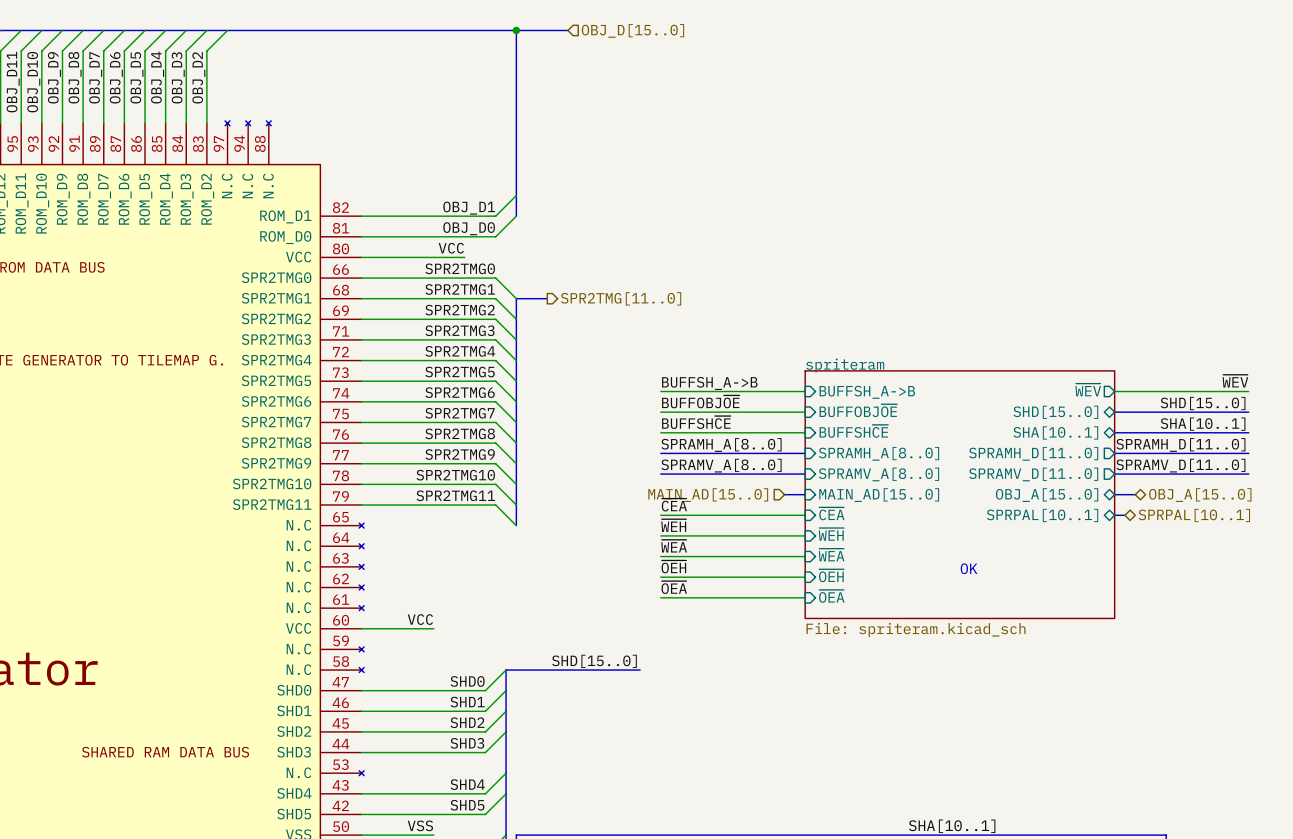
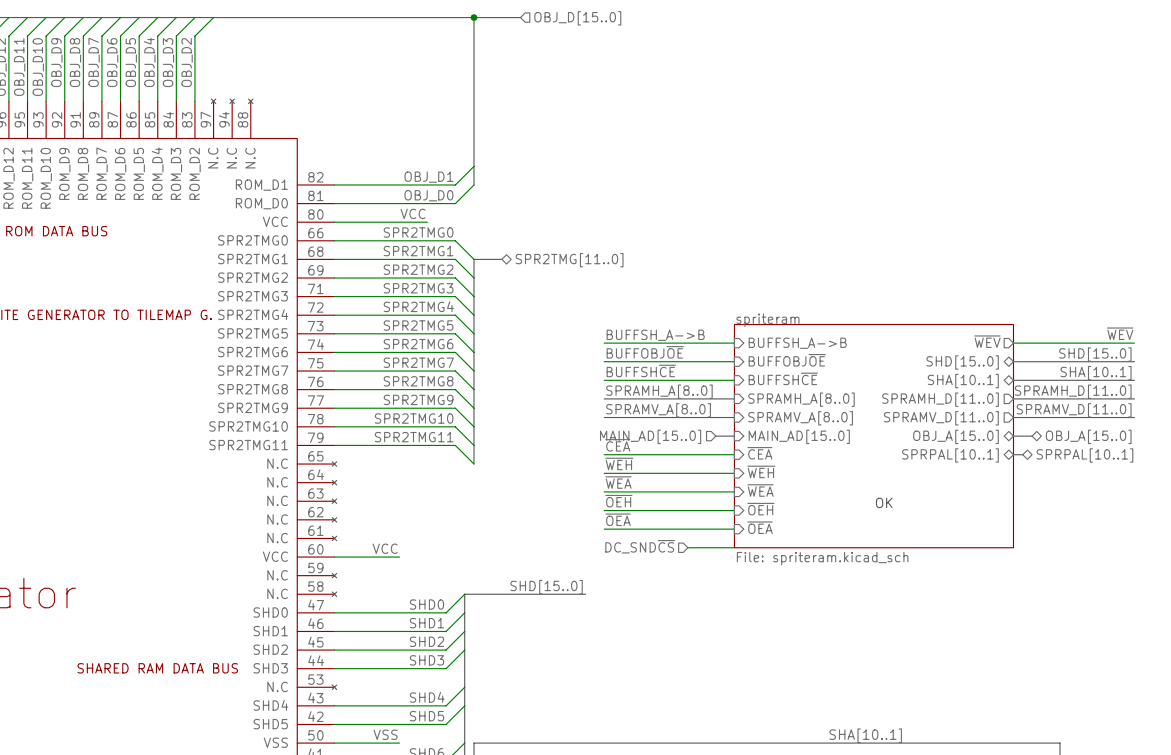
hierarchical label shape: output (621, 298) -> bidirectional (569, 260)
hierarchical label: none -> DC_SND~{CS} (640, 546)
wire: none -> (687, 547) (734, 547)

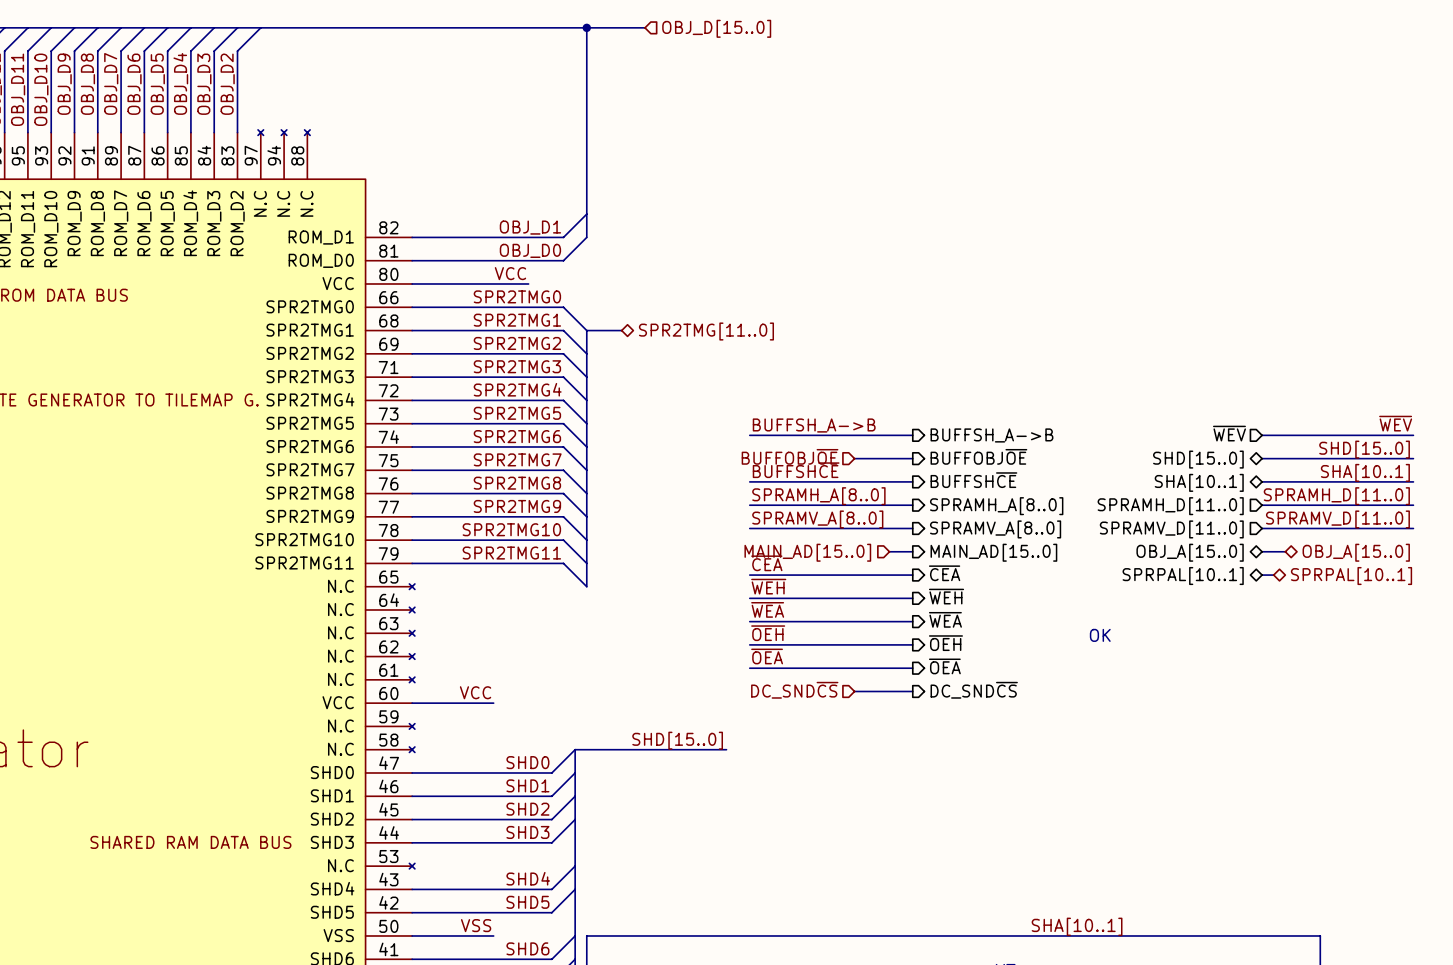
label: BUFFOBJ~{OE} (645, 352) -> none
hierarchical label: none -> BUFFOBJ~{OE} (790, 456)
wire: (604, 361) (687, 361) -> none
sheet spriteram: File: spriteram.kicad_sch (873, 436) -> none
sheet pin: none -> DC_SND~{CS} (974, 690)

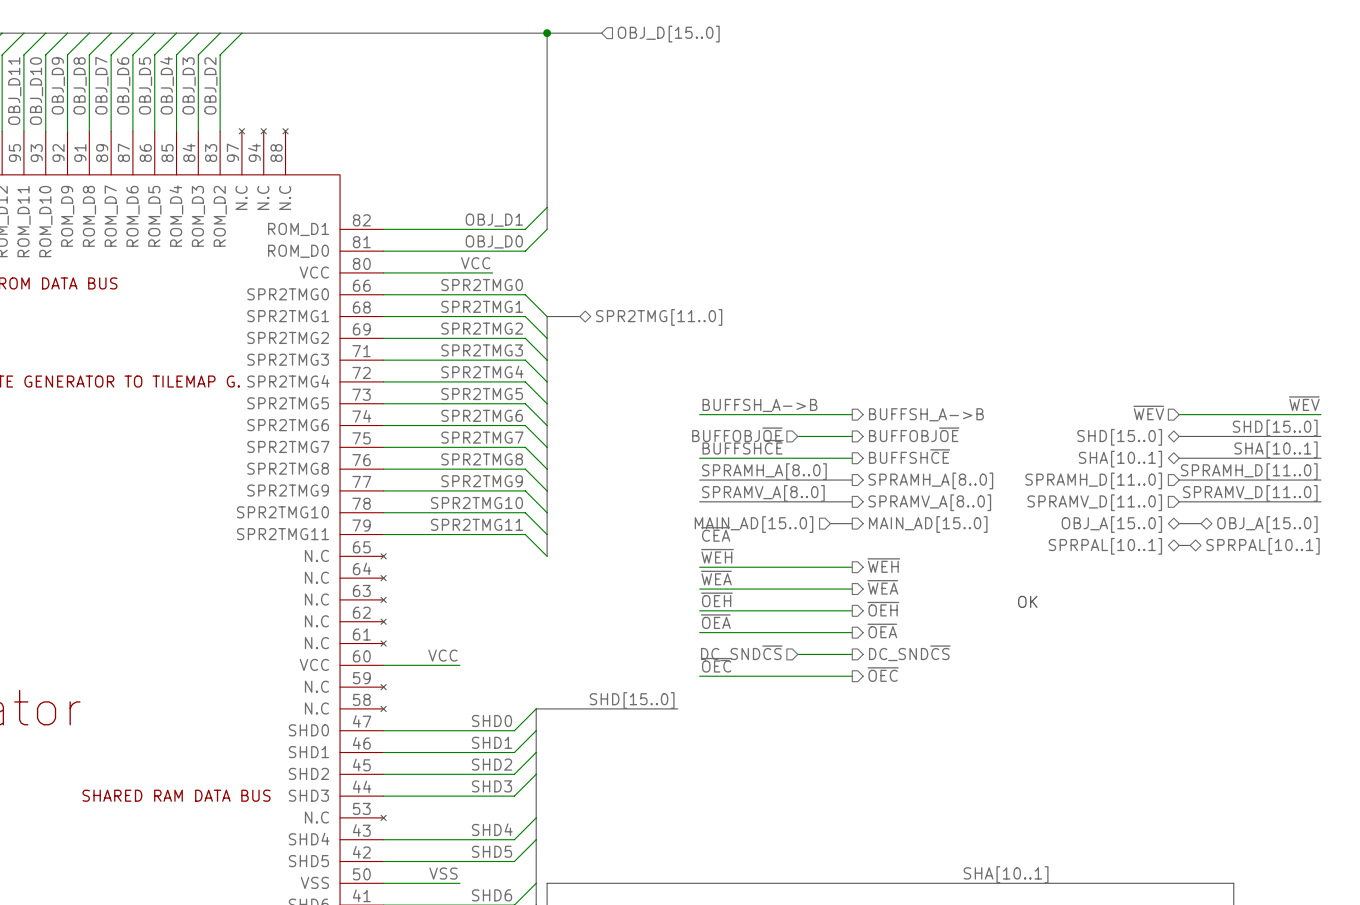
sheet pin: ~{CEA} (944, 573) -> none
wire: (749, 575) (912, 575) -> (699, 676) (852, 676)
label: none -> ~{OEC} (716, 665)
sheet pin: none -> ~{OEC} (883, 674)

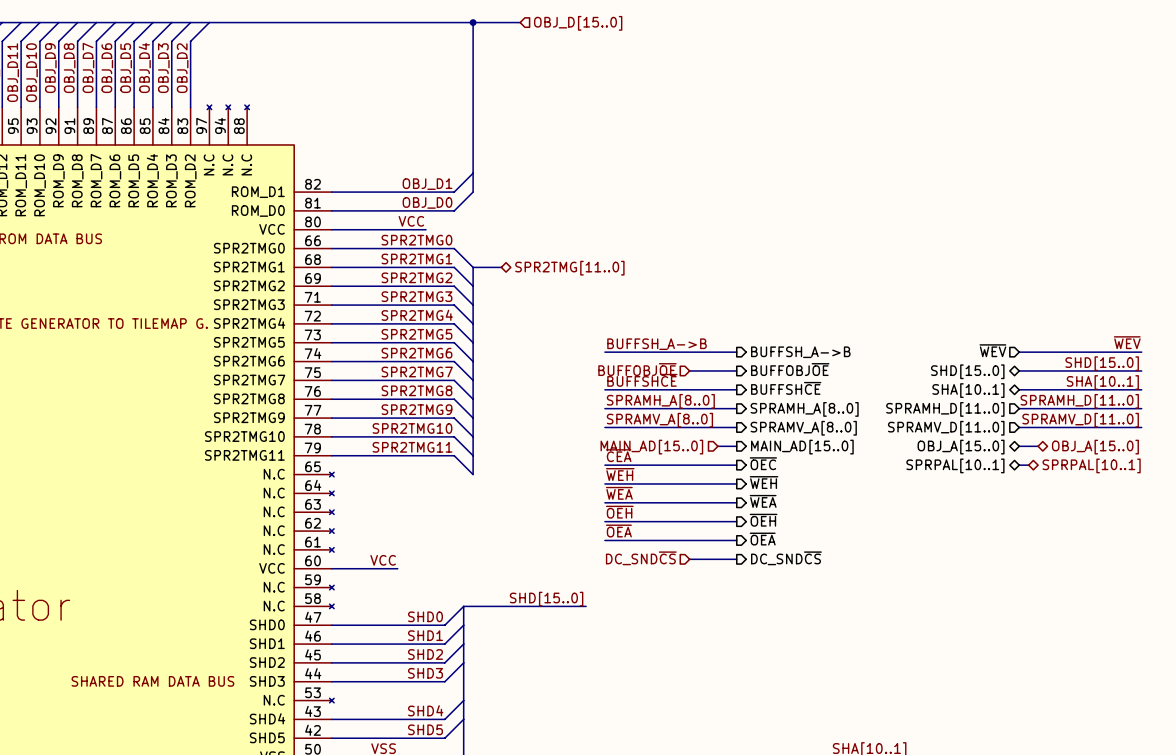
text: OK (1027, 601) -> none
label: ~{OEC} (716, 665) -> none
sheet pin position: ~{OEC} (883, 674) -> ~{OEC} (763, 463)
wire: (699, 676) (852, 676) -> (604, 465) (736, 465)

